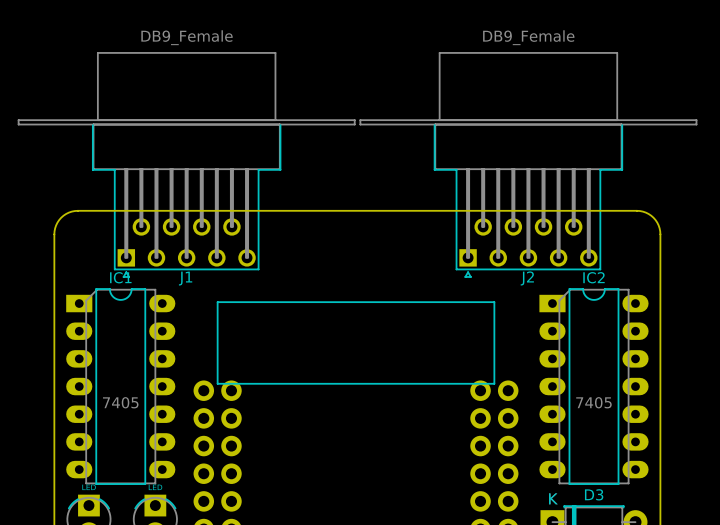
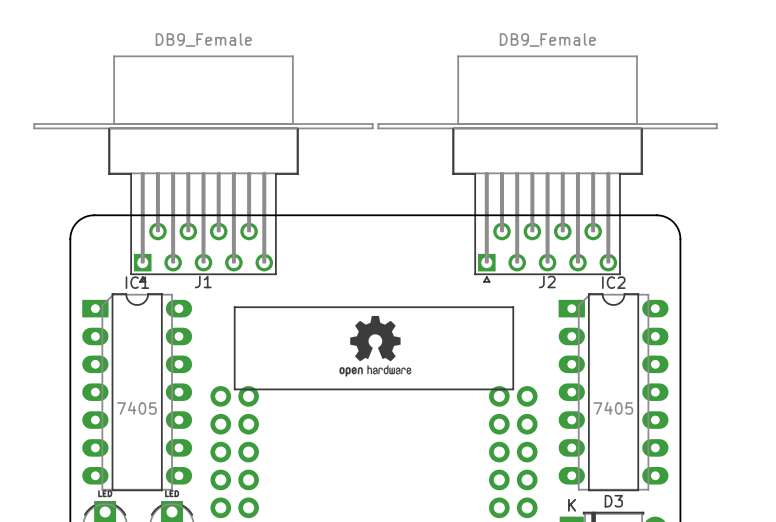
drawing: none -> [339, 315, 412, 377]

